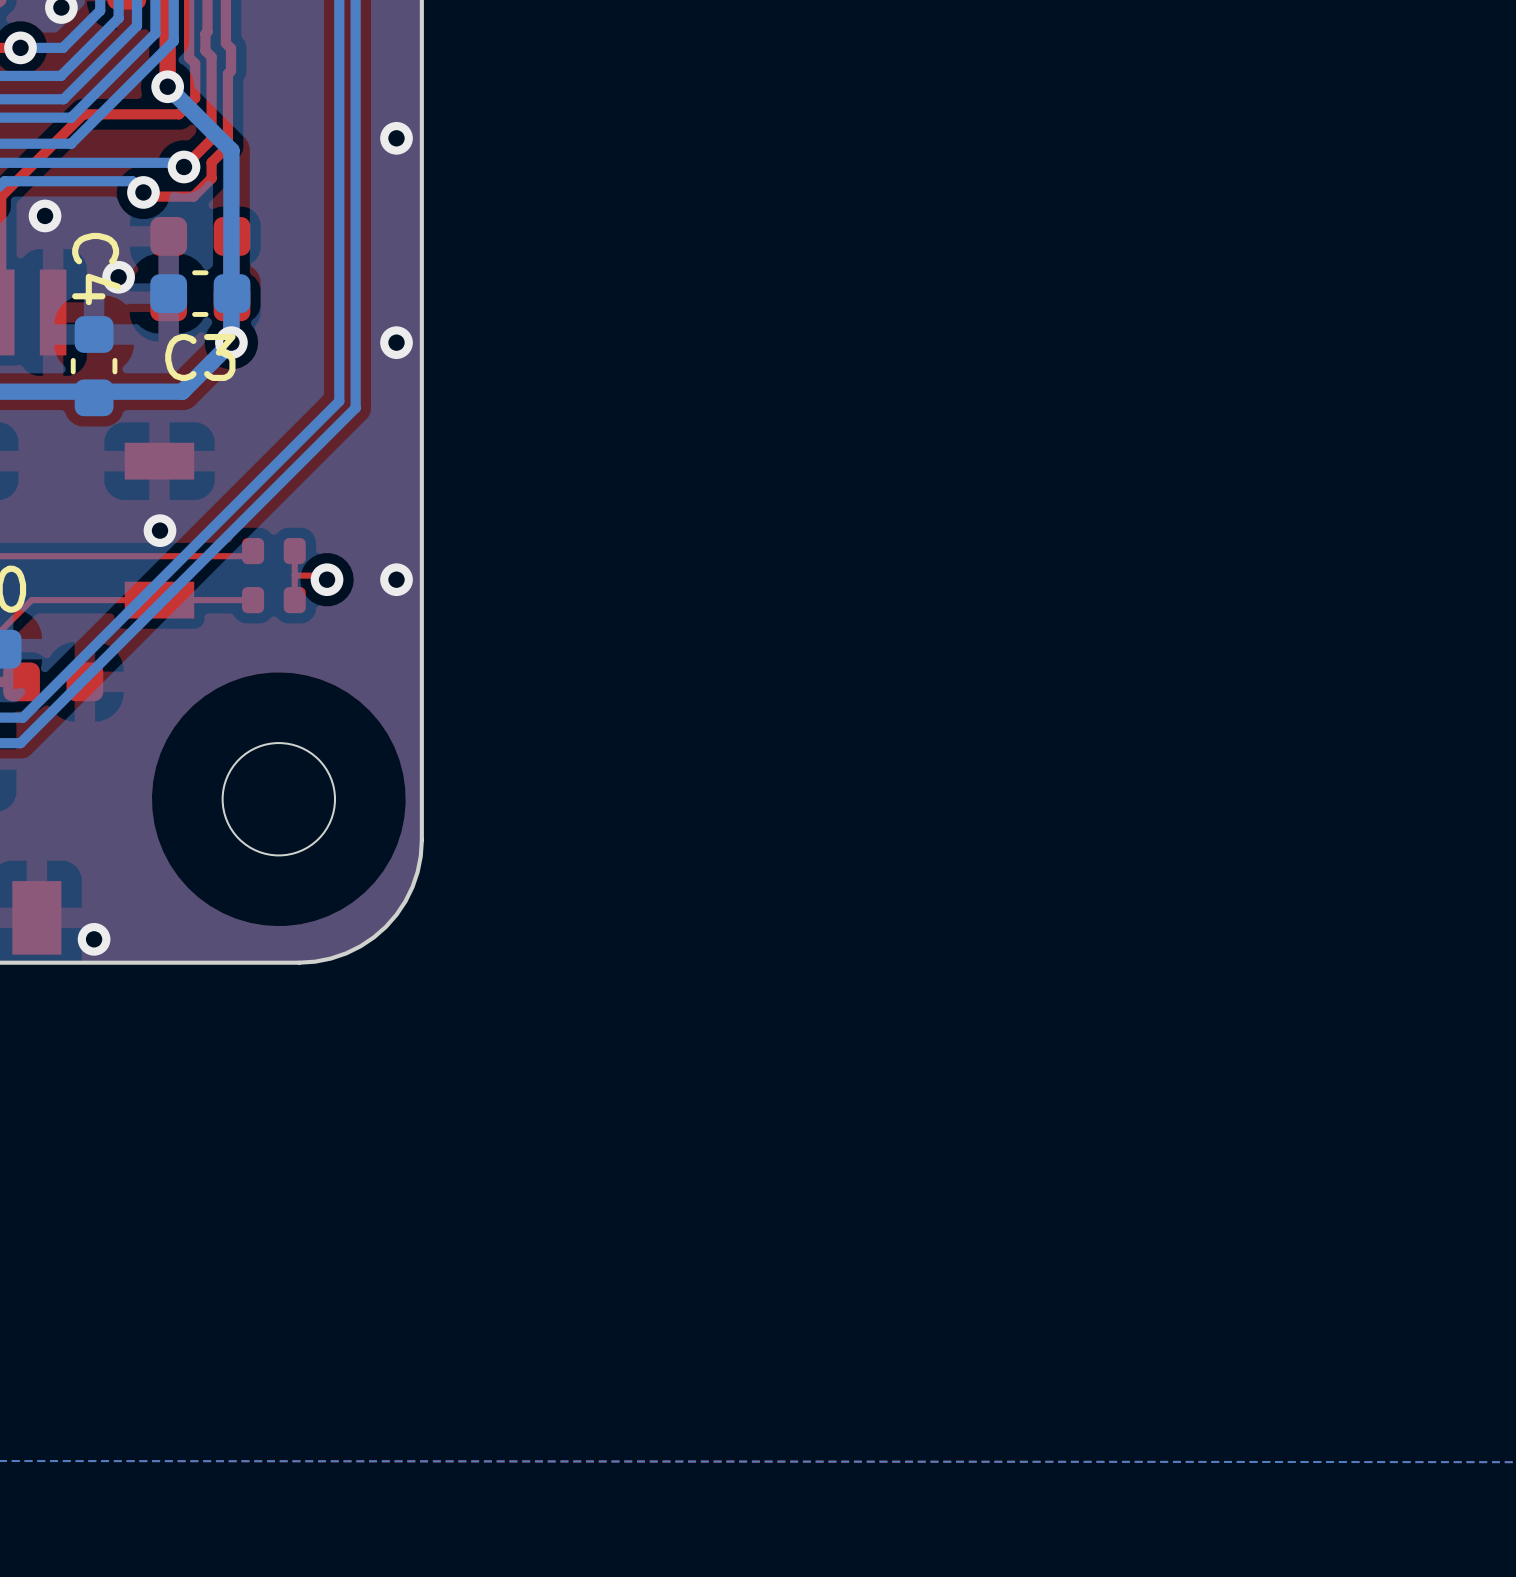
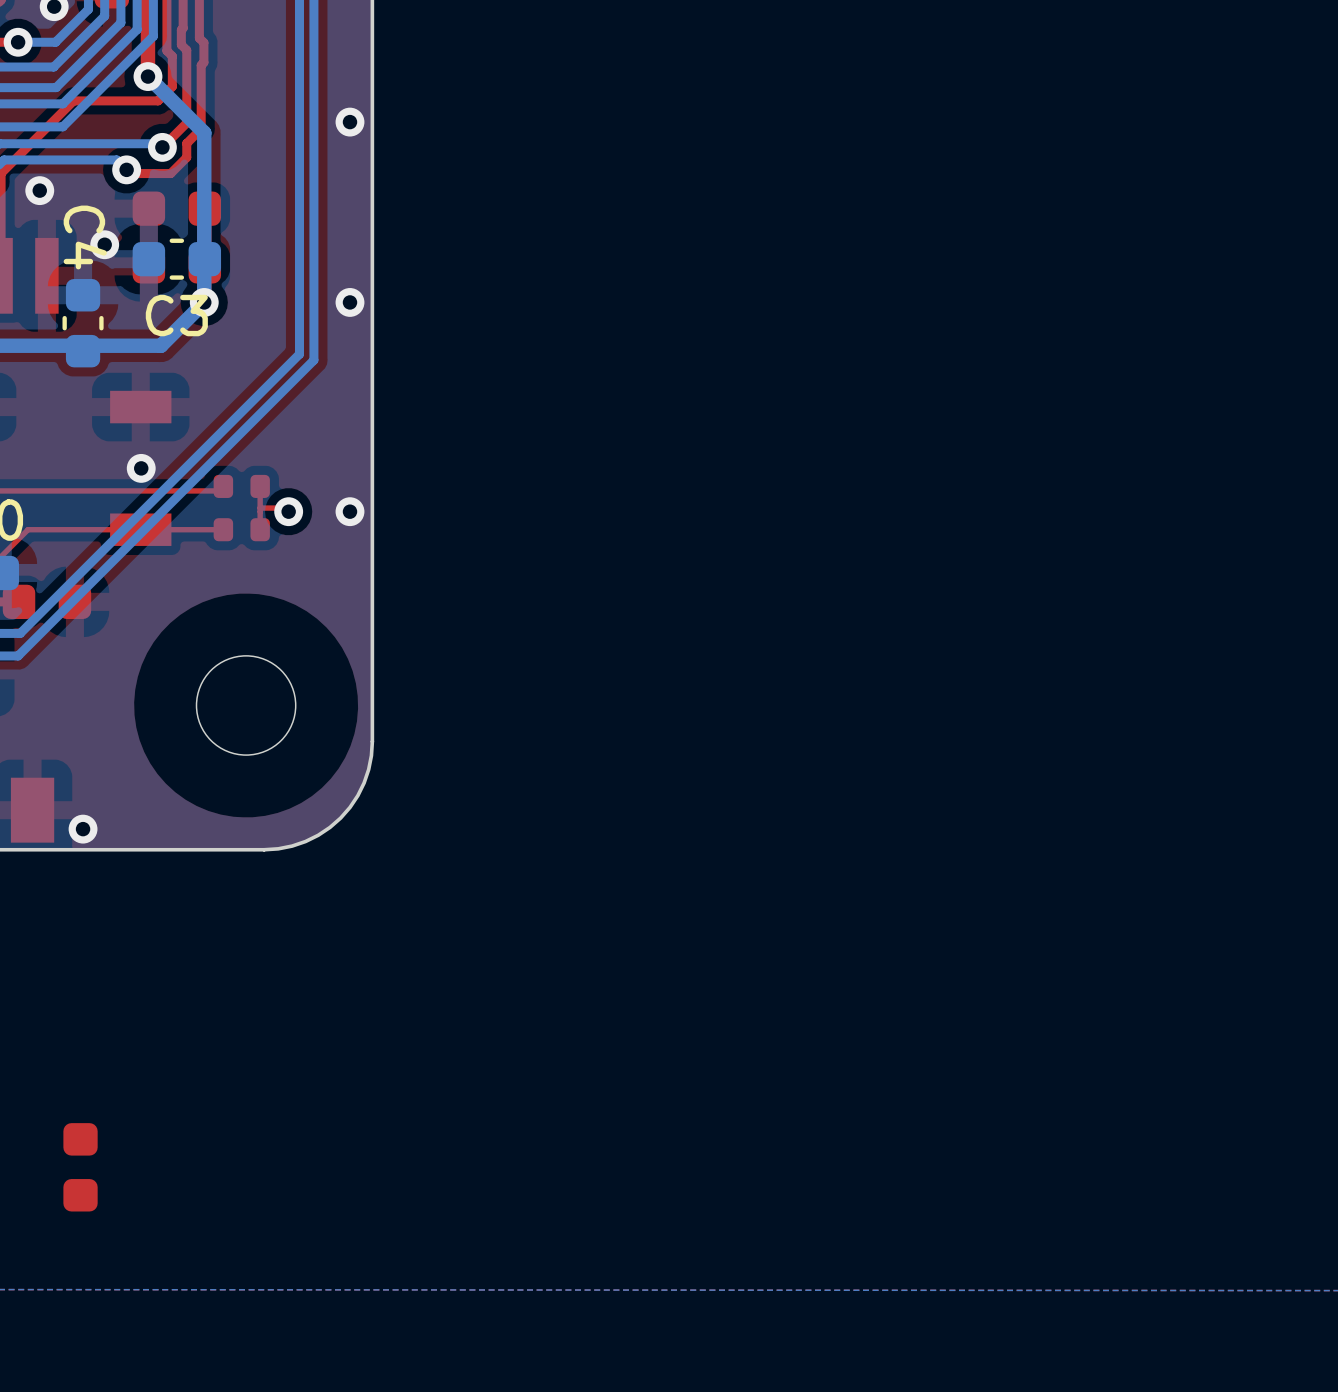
part: none -> (80, 1167)

